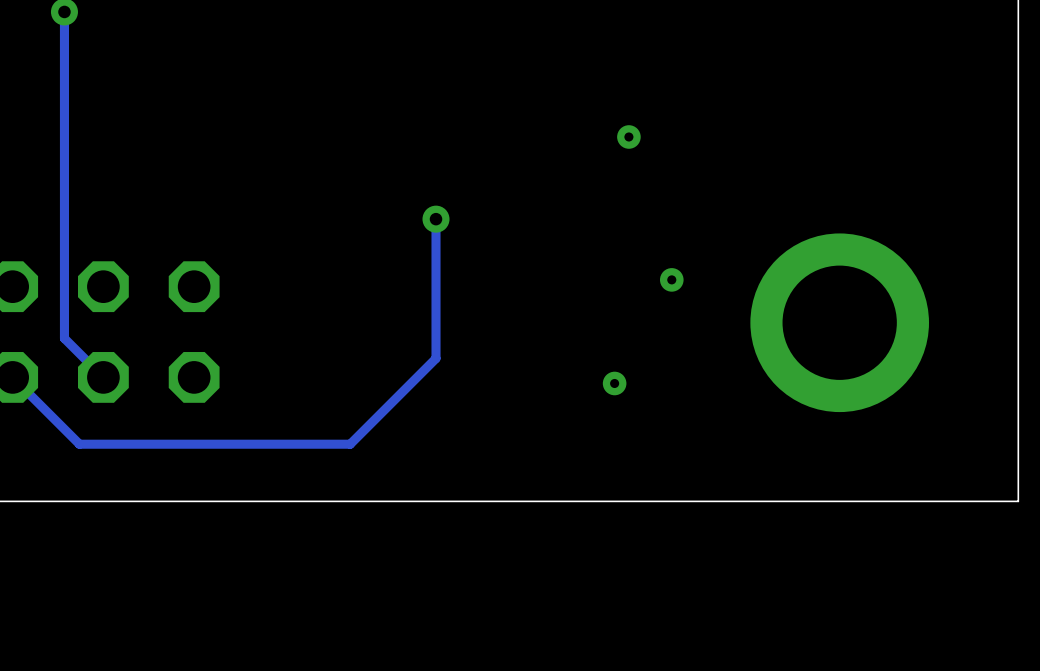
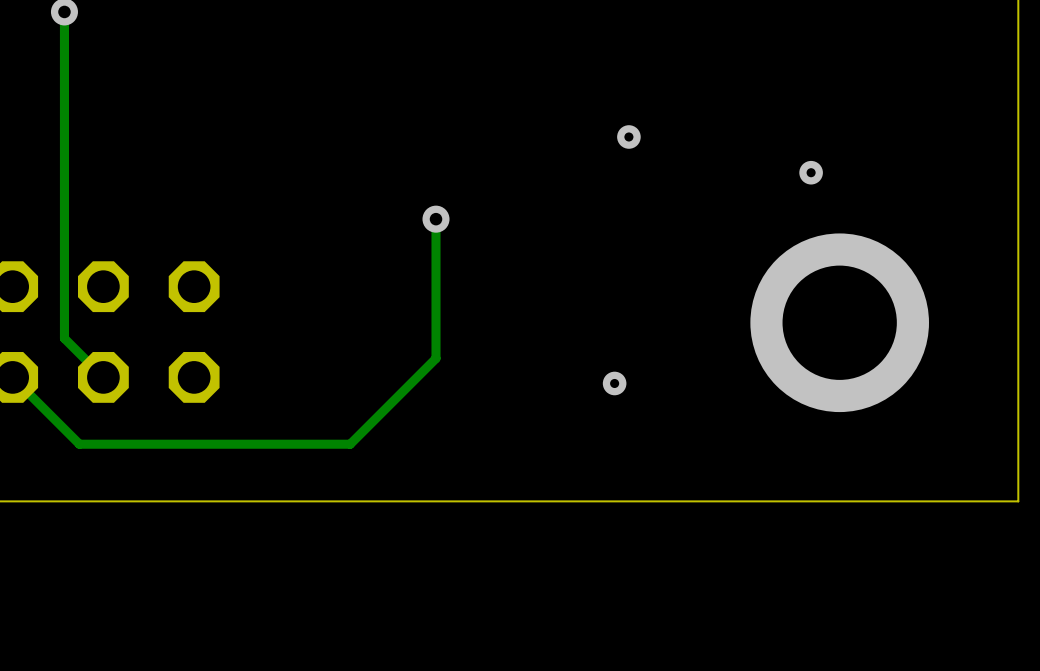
via position: (671, 279) -> (811, 172)

